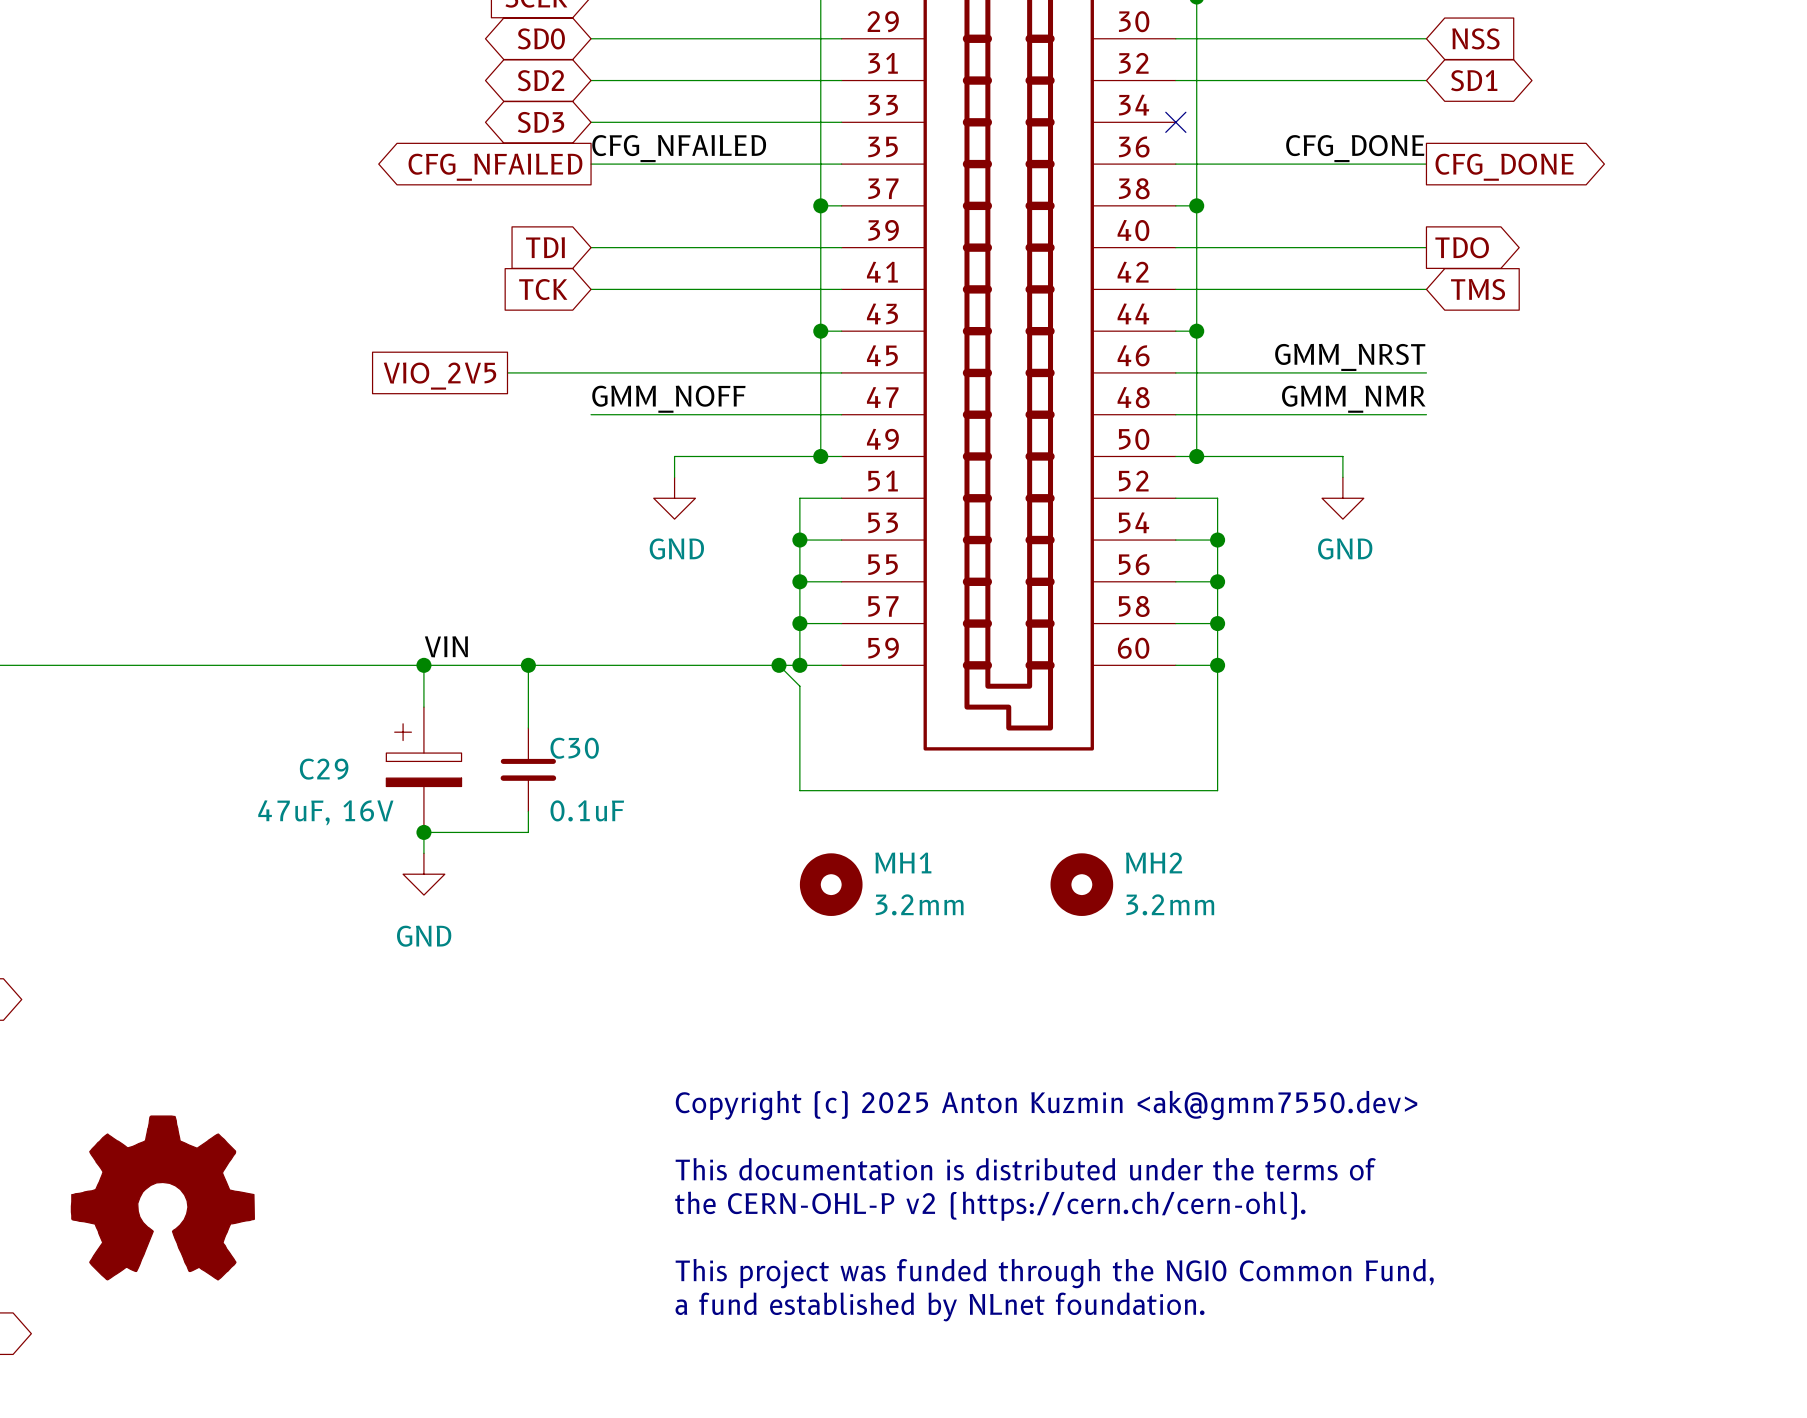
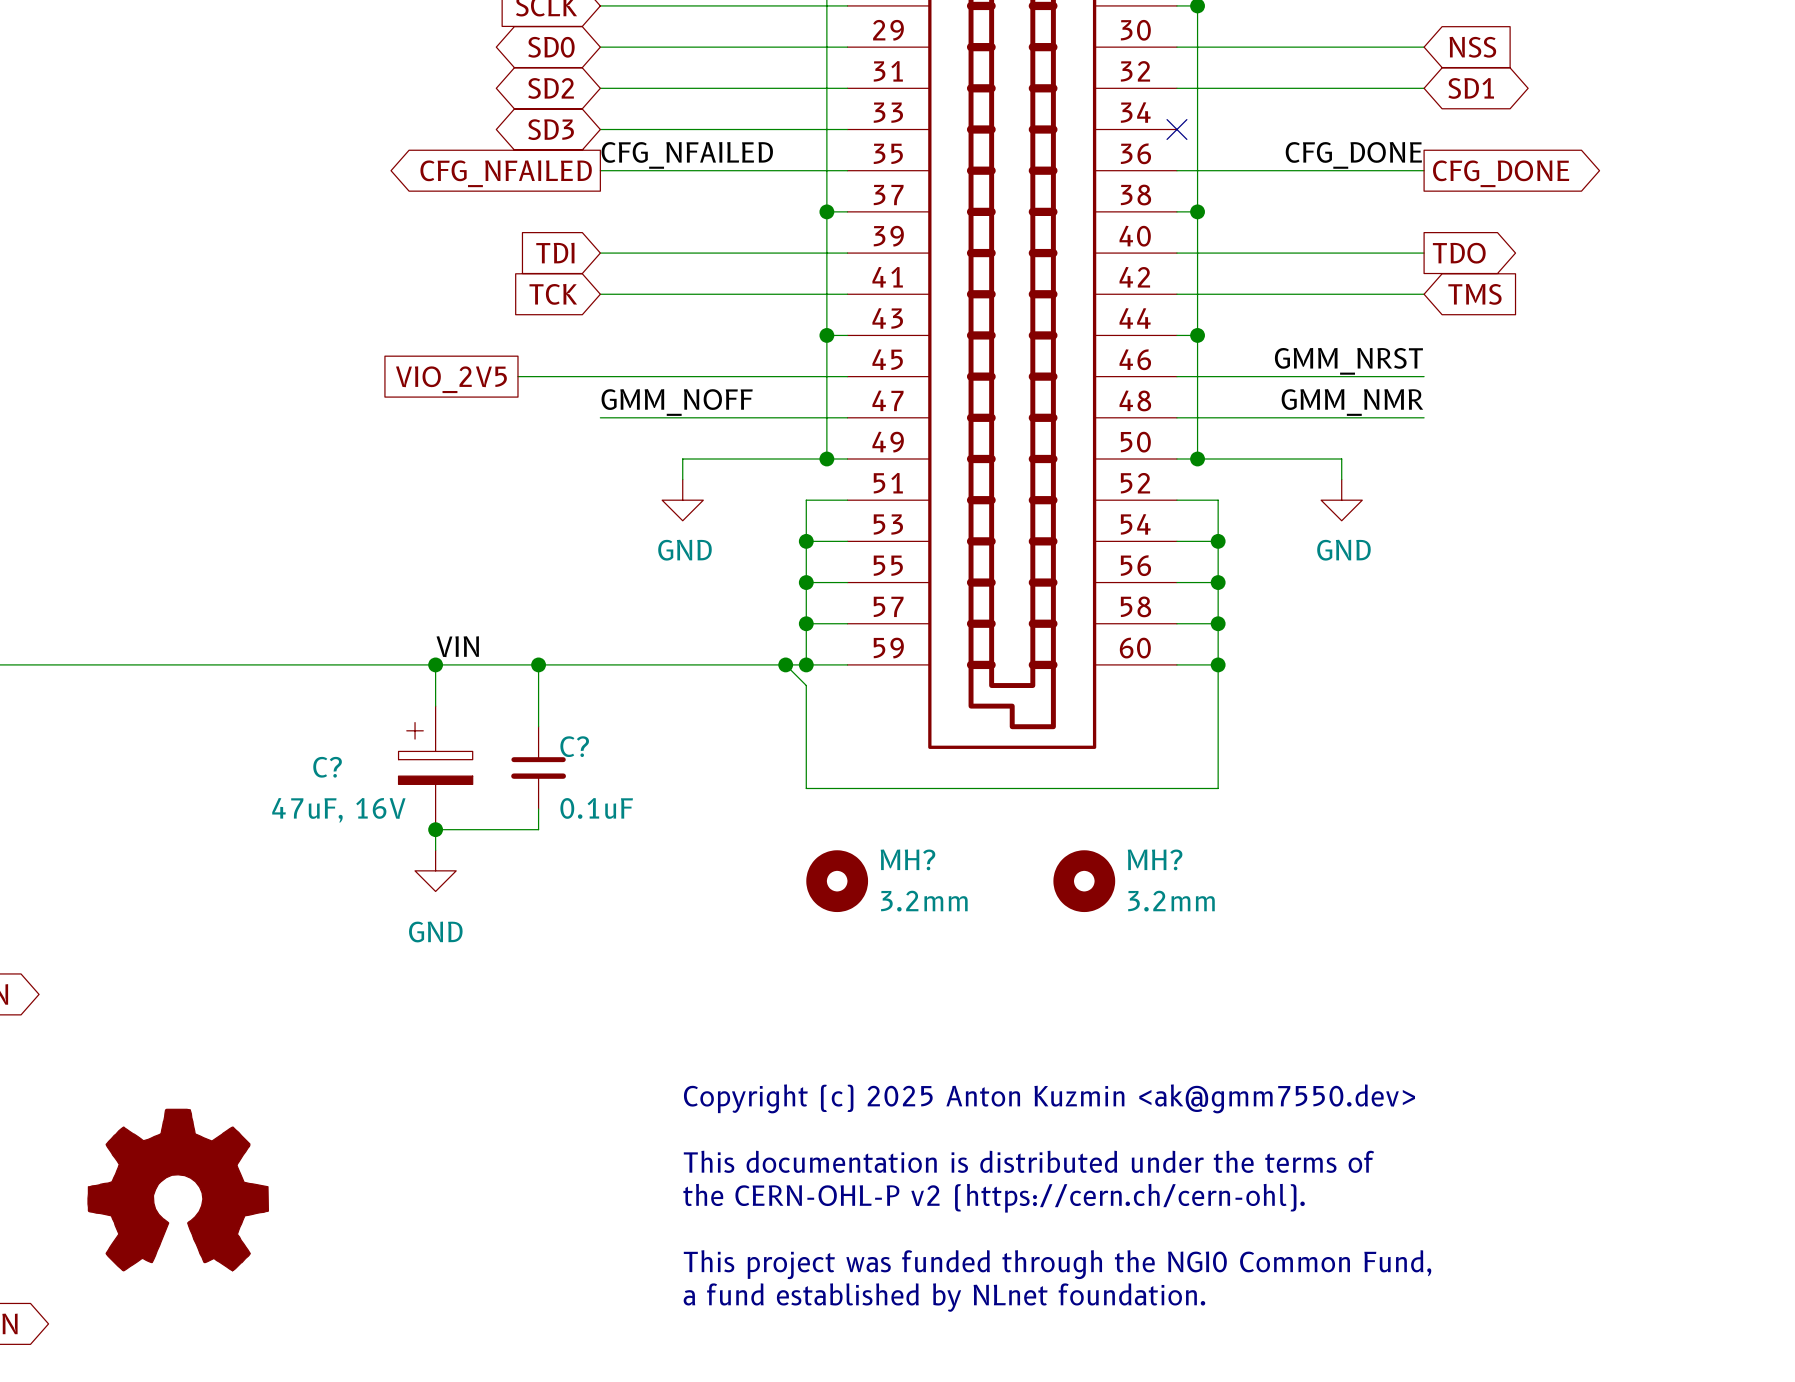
C30 name: C30 (574, 748) -> C? (574, 746)
C29 name: C29 (324, 769) -> C? (327, 767)
MH1 name: MH1 (903, 862) -> MH? (907, 859)
MH2 name: MH2 (1154, 862) -> MH? (1155, 859)

